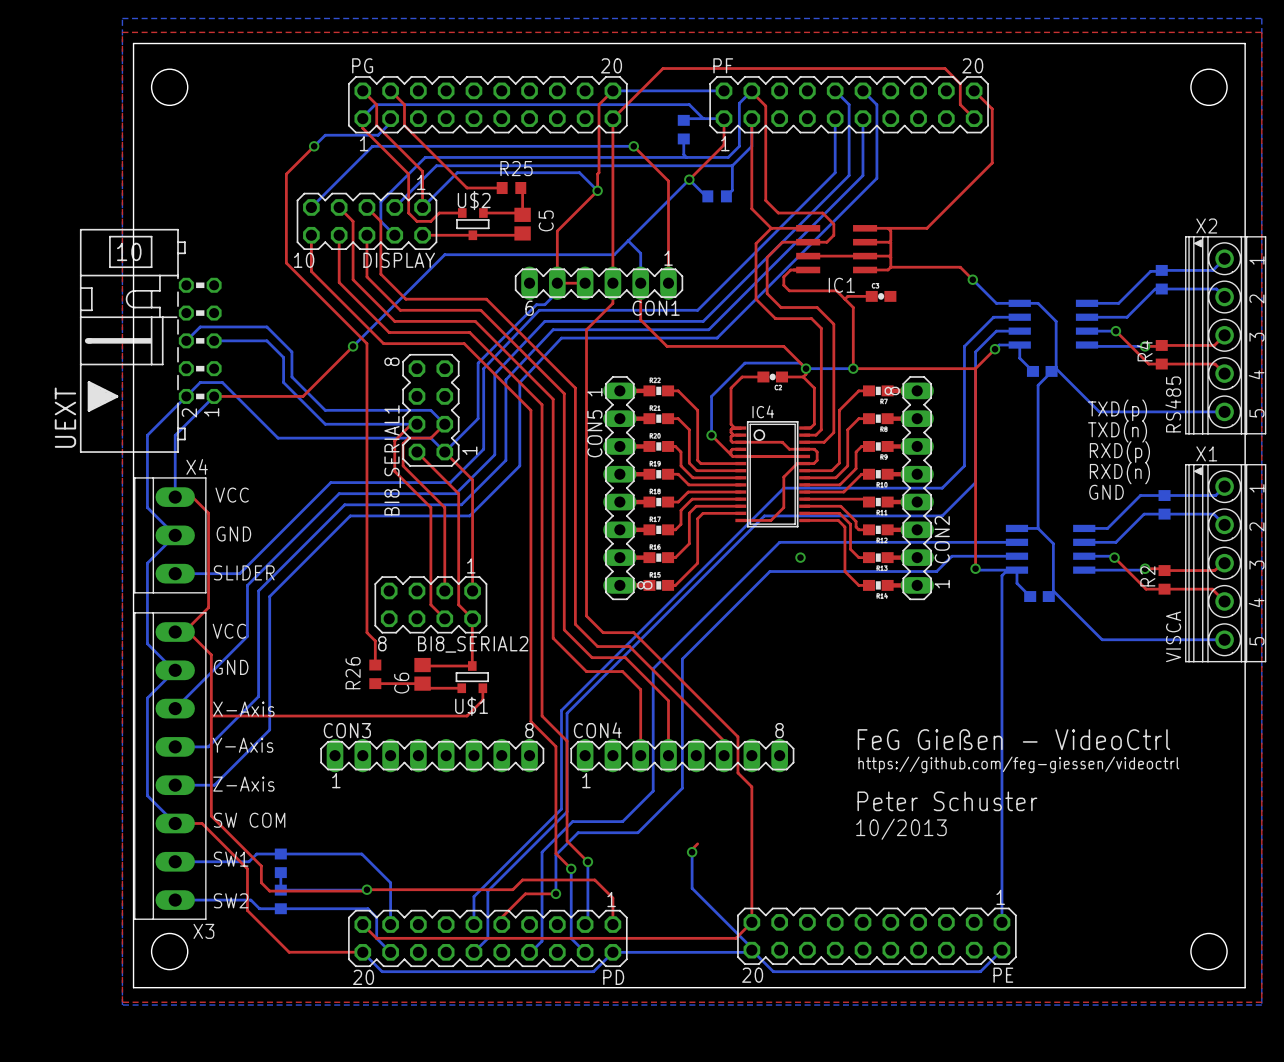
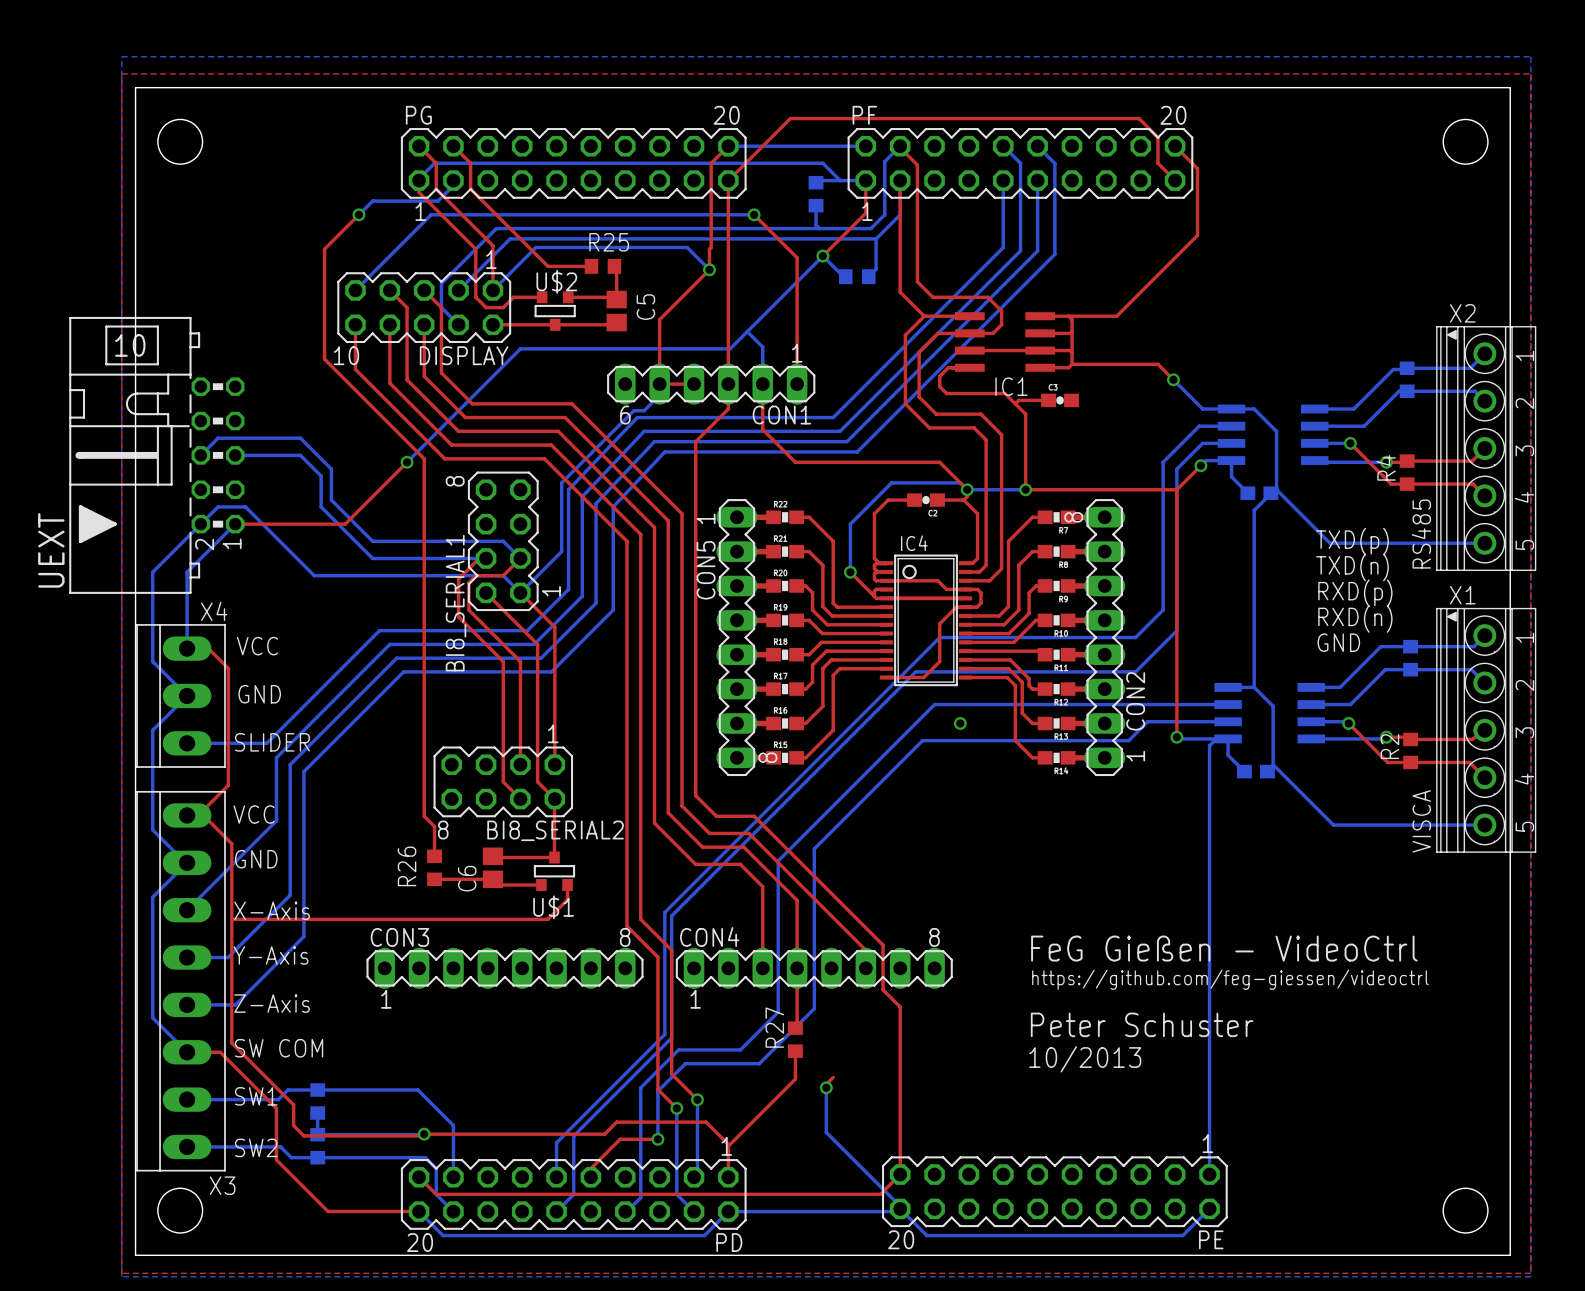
top track: none -> (797, 968) (797, 1028) (795, 1028)
R27: none -> (795, 1039)
top track: none -> (795, 1051) (795, 1079) (728, 1146)

